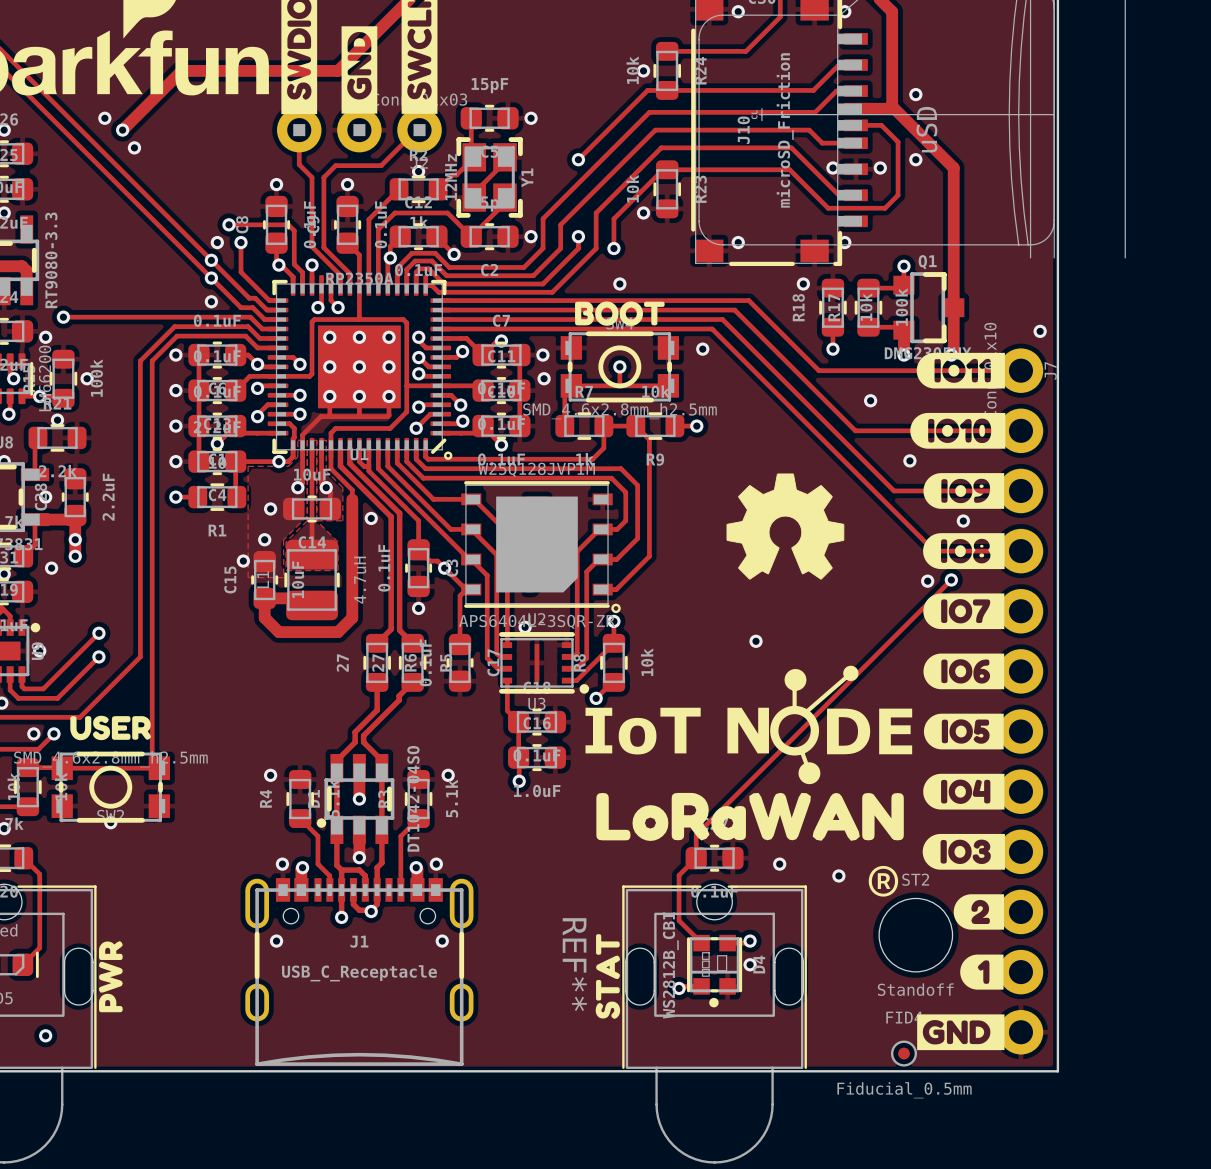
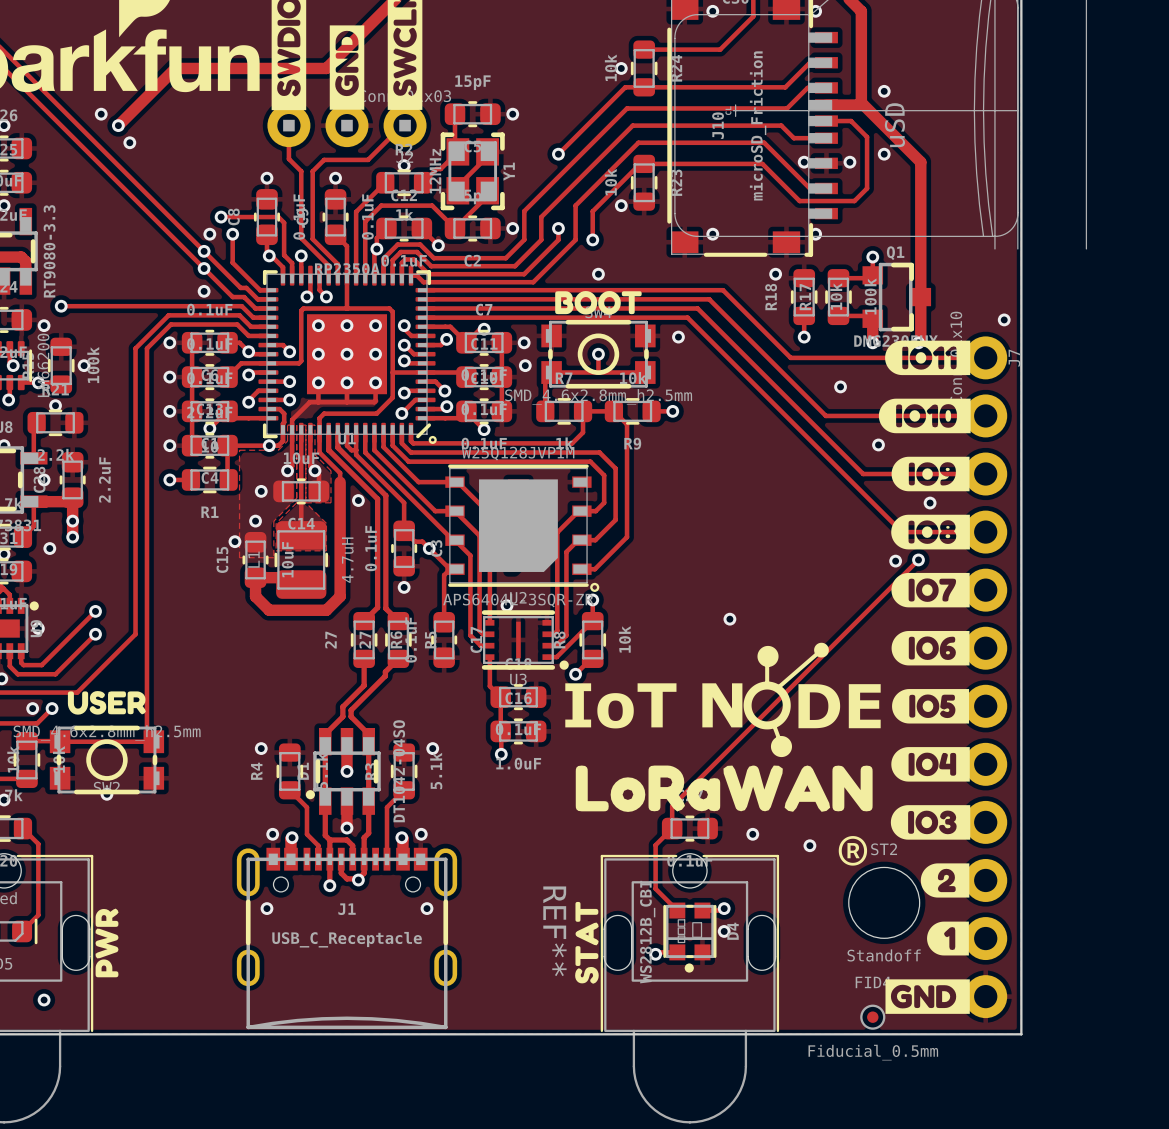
drawing: [726, 473, 845, 580] -> none

